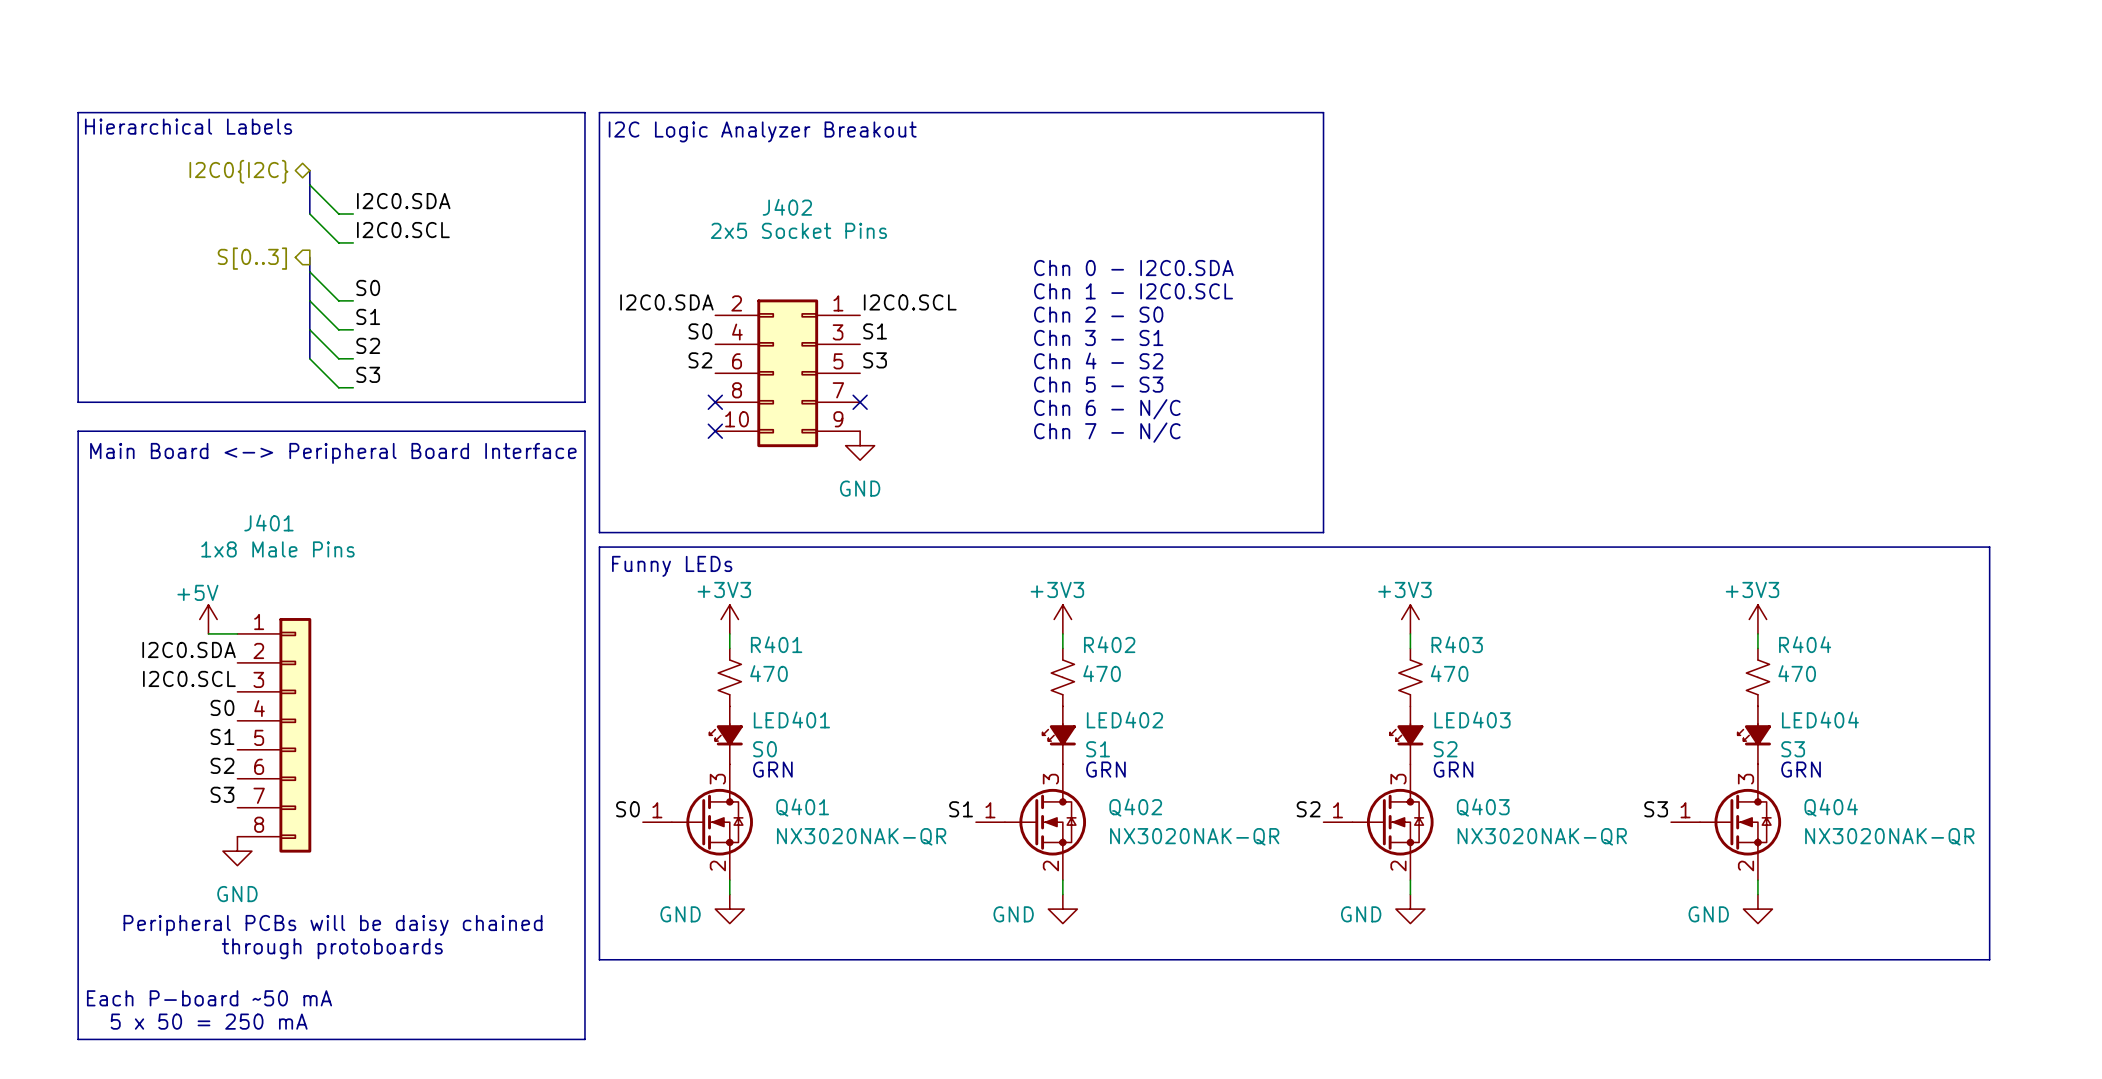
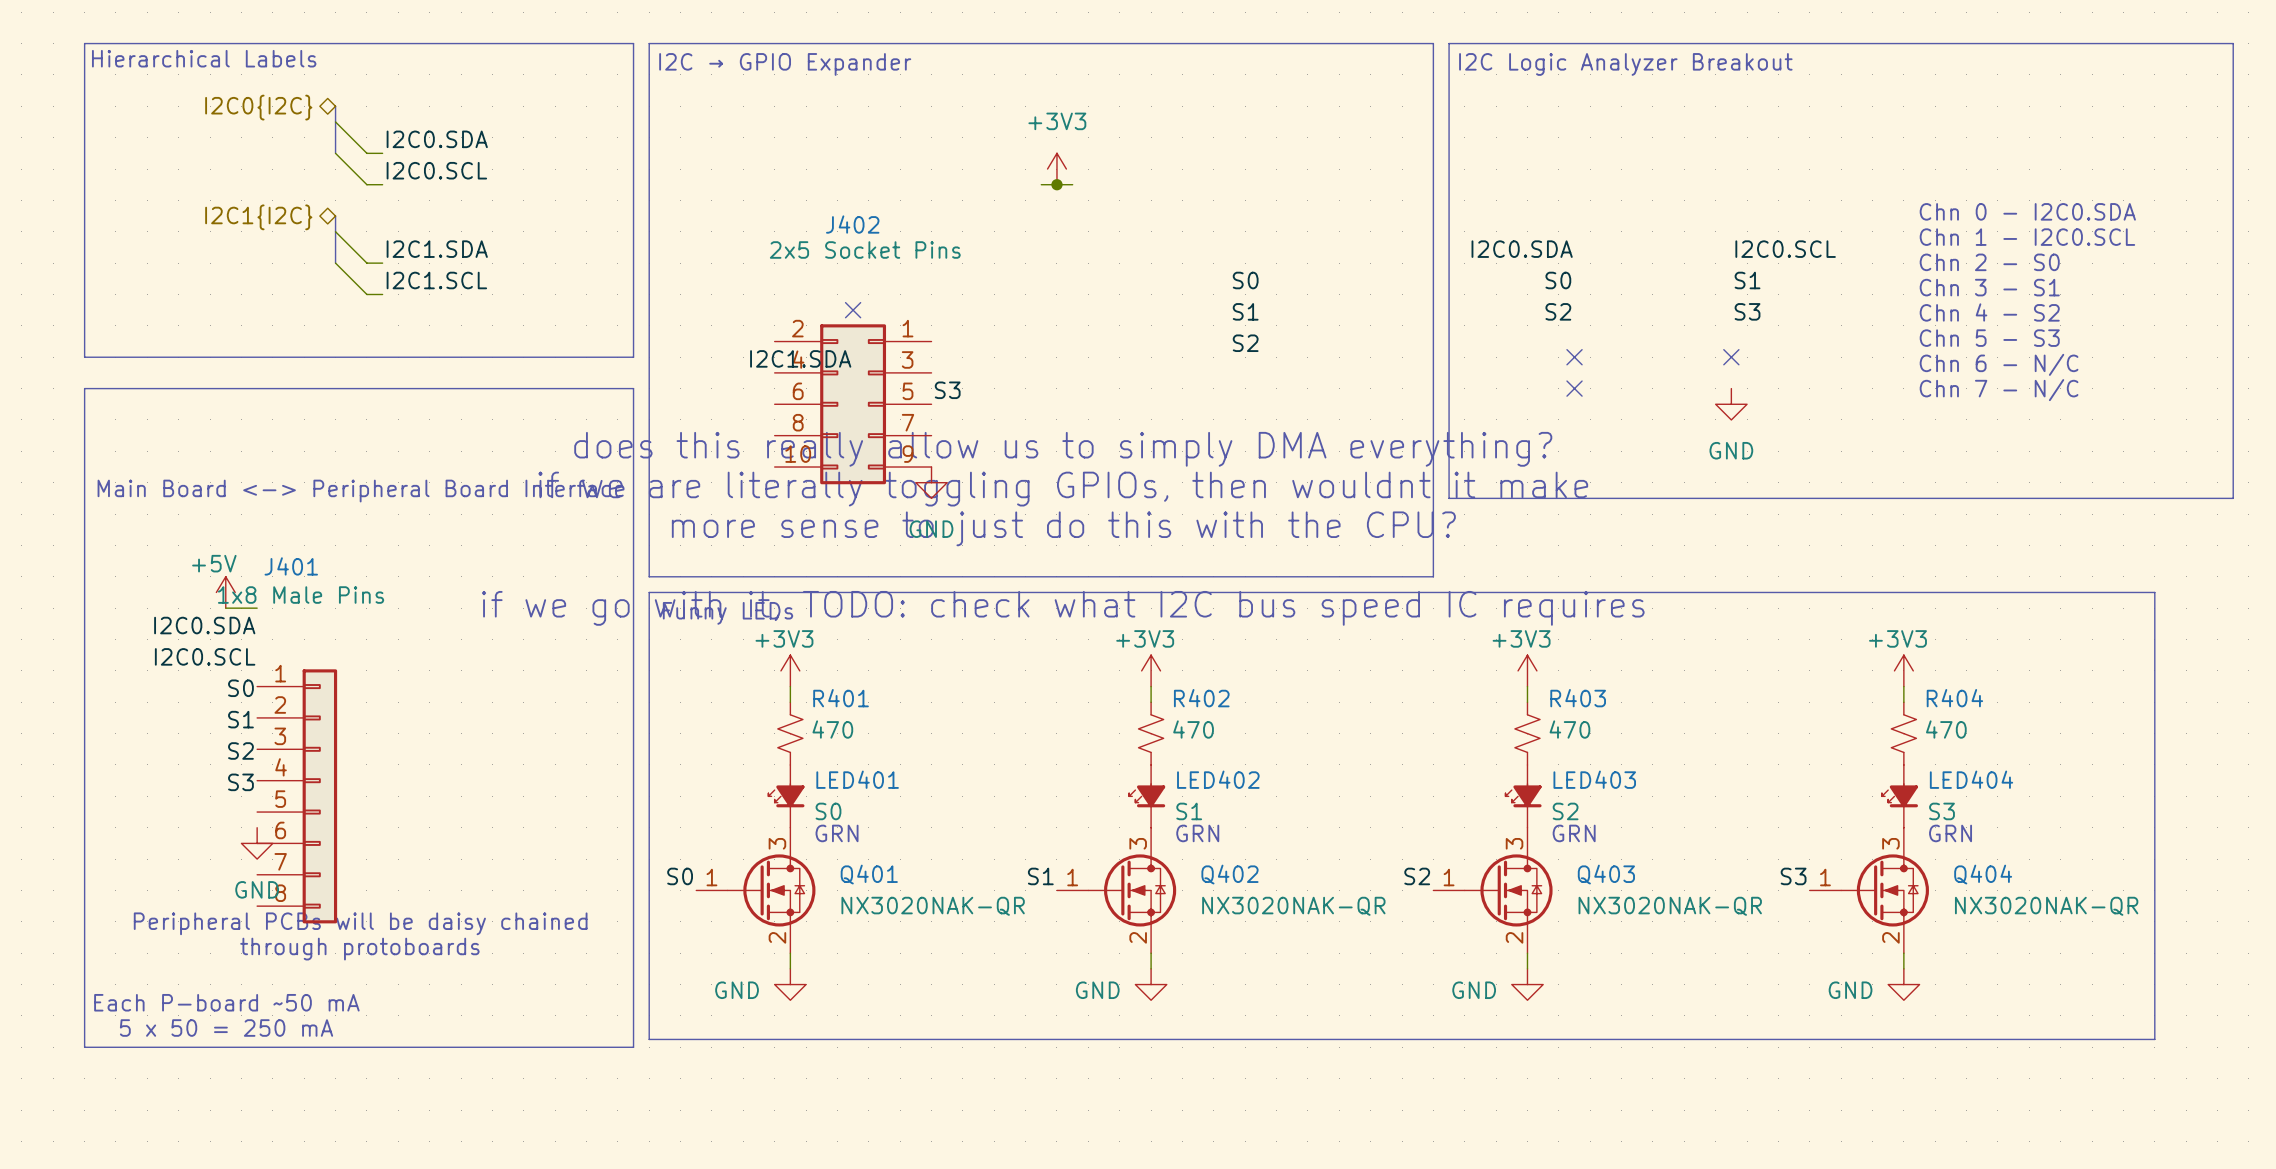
line: none -> (1449, 43) (2233, 43) (2233, 498) (1449, 498) (1449, 43)
text: none -> I2C → GPIO Expander (785, 64)
text: none -> I2C Logic Analyzer Breakout (1625, 64)
bus: none -> (335, 106) (335, 153)
line: (78, 112) (584, 112) -> (84, 121) (84, 43) (633, 43) (633, 121)
line: (599, 112) (1323, 112) -> (649, 121) (649, 43) (1433, 43) (1433, 121)
text position: Hierarchical Labels (188, 126) -> Hierarchical Labels (204, 58)
text: I2C Logic Analyzer Breakout (762, 131) -> none
power symbol: none -> +3V3 (1056, 169)
label: none -> I2C0.SCL (436, 170)
bus: (309, 170) (309, 199) -> (335, 231) (335, 263)
wire: none -> (1041, 184) (1072, 184)
junction: none -> (1056, 184)
hierarchical label position: I2C0{I2C} (238, 171) -> I2C0{I2C} (258, 107)
wire: (309, 185) (338, 213) (353, 213) -> (335, 121) (366, 153) (382, 153)
text: none -> Chn 0 - I2C0.SDA (2027, 211)
hierarchical label: none -> I2C1{I2C} (258, 217)
label position: I2C0.SDA (403, 201) -> I2C0.SDA (437, 139)
text: none -> Chn 1 - I2C0.SCL (2027, 237)
label: I2C0.SCL (403, 230) -> I2C1.SDA (437, 249)
label: none -> I2C0.SDA (1522, 249)
label: none -> I2C0.SCL (1785, 249)
text: none -> Chn 2 - S0 (1989, 262)
bus: (309, 257) (309, 358) -> none
hierarchical label: S[0..3] (252, 258) -> none
label: none -> I2C1.SCL (436, 280)
label: none -> S0 (1245, 280)
label: none -> S0 (1558, 280)
label: none -> S1 (1747, 280)
text: none -> Chn 3 - S1 (1989, 287)
text: Chn 0 - I2C0.SDA (1133, 268) -> none
wire: (309, 271) (338, 300) (353, 300) -> (335, 263) (366, 294) (382, 294)
no-connect mark: none -> (853, 310)
label: S0 (368, 287) -> none
label: none -> S2 (1558, 311)
label: none -> S3 (1747, 311)
text: none -> Chn 4 - S2 (1989, 312)
text: Chn 1 - I2C0.SCL (1133, 291) -> none
wire: (309, 300) (338, 329) (353, 329) -> (335, 153) (366, 184) (382, 184)
label: I2C0.SDA (666, 302) -> I2C1.SDA (800, 358)
label: I2C0.SCL (910, 302) -> none
text: none -> Chn 5 - S3 (1989, 338)
text: Chn 2 - S0 (1098, 314) -> none
label: S1 (368, 316) -> none
label: none -> S2 (1245, 343)
line: (78, 329) (78, 358) -> (84, 357) (633, 357)
wire: (309, 329) (338, 358) (353, 358) -> none
line: (584, 329) (584, 358) -> (84, 388) (633, 388)
no-connect mark: none -> (1574, 357)
no-connect mark: none -> (1731, 357)
label: S0 (700, 331) -> none
label position: S1 (875, 331) -> S1 (1245, 311)
text: none -> Chn 6 - N/C (1999, 364)
text: Chn 3 - S1 (1098, 337) -> none
label: S2 (368, 345) -> none
wire: (309, 358) (338, 387) (353, 387) -> none
no-connect mark: none -> (1574, 388)
label: S2 (700, 360) -> none
text: Chn 4 - S2 (1098, 360) -> none
text: none -> Chn 7 - N/C (1999, 390)
power symbol: none -> GND (1731, 404)
label: S3 (368, 374) -> none
text: Chn 5 - S3 (1098, 384) -> none
line: (78, 402) (584, 402) -> (84, 435) (84, 467)
no-connect mark: (715, 402) -> none
no-connect mark: (860, 402) -> none
text: Chn 6 - N/C (1107, 409) -> none
text: none -> does this really allow us to simply DMA everything? (1063, 449)
line: (78, 431) (584, 431) -> (633, 435) (633, 467)
no-connect mark: (715, 431) -> none
text: Chn 7 - N/C (1107, 432) -> none
text: none -> if we are literally toggling GPIOs, then wouldnt it make (1063, 489)
text: none -> more sense to just do this with the CPU? (1063, 528)
text: none -> if we go with it, TODO: check what I2C bus speed IC requires (1063, 608)
power symbol position: +5V (208, 619) -> +5V (225, 592)
wire: (208, 633) (237, 633) -> (225, 608) (257, 608)
label position: I2C0.SDA (189, 649) -> I2C0.SDA (204, 625)
label position: I2C0.SCL (189, 678) -> I2C0.SCL (205, 656)
label position: S0 (222, 707) -> S0 (240, 688)
label position: S1 (222, 736) -> S1 (240, 719)
label position: S2 (222, 765) -> S2 (240, 750)
label position: S3 (222, 794) -> S3 (240, 782)
power symbol position: GND (237, 851) -> GND (257, 843)
text position: Peripheral PCBs will be daisy chained (333, 925) -> Peripheral PCBs will be daisy chained (360, 923)
text position: through protoboards (332, 948) -> through protoboards (359, 949)
line: (78, 967) (78, 1039) (584, 1039) (584, 967) -> (84, 1047) (633, 1047)
text position: Each P-board ~50 mA (209, 998) -> Each P-board ~50 mA (226, 1002)
text position: 5 x 50 = 250 mA (209, 1021) -> 5 x 50 = 250 mA (226, 1028)

